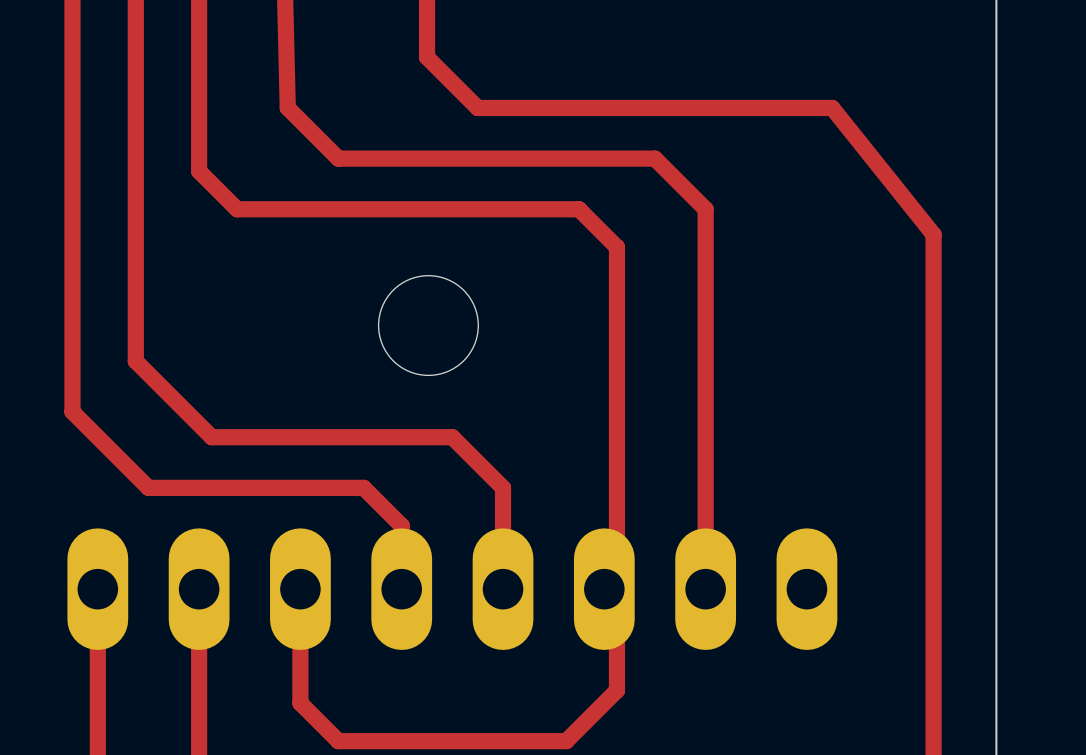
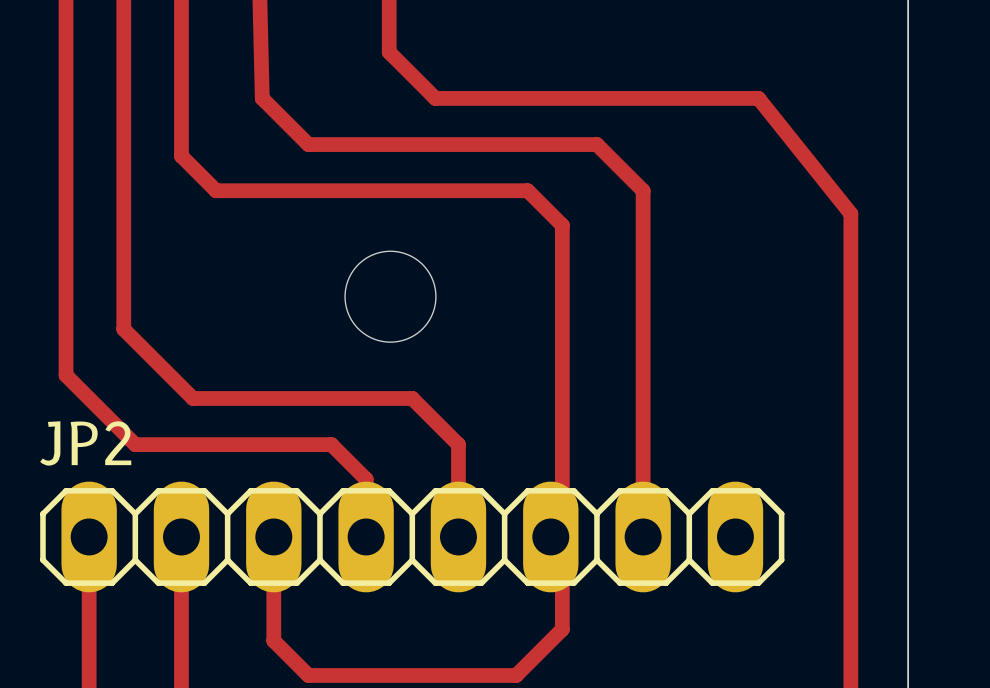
JP2 side: bottom (452, 589) -> top (412, 536)

